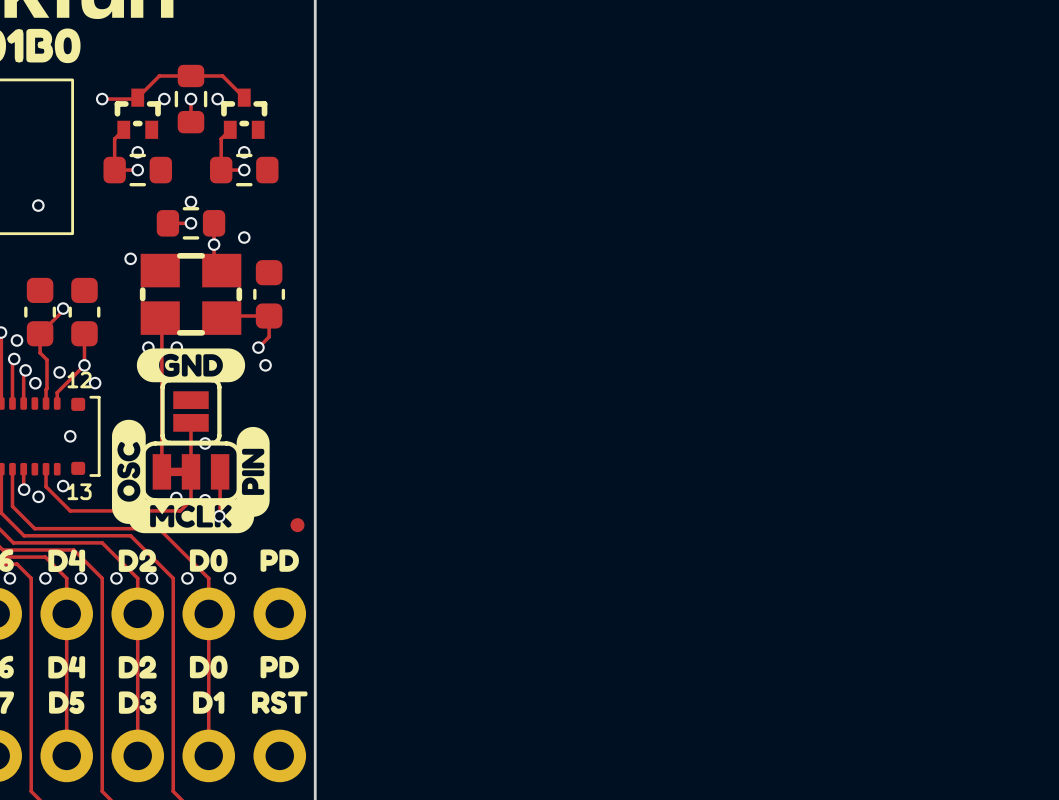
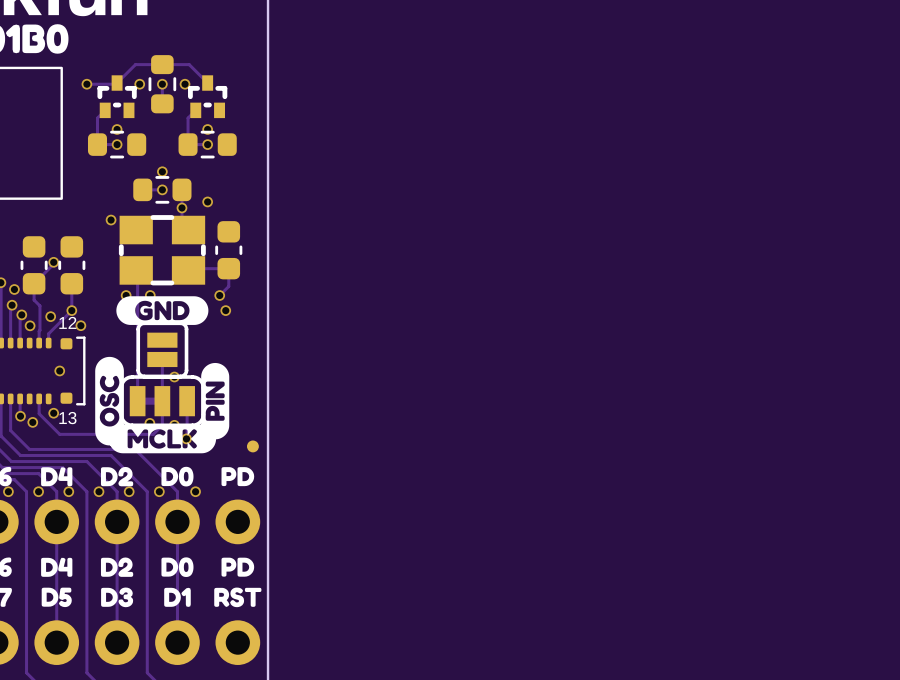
via: (38, 205) -> none

